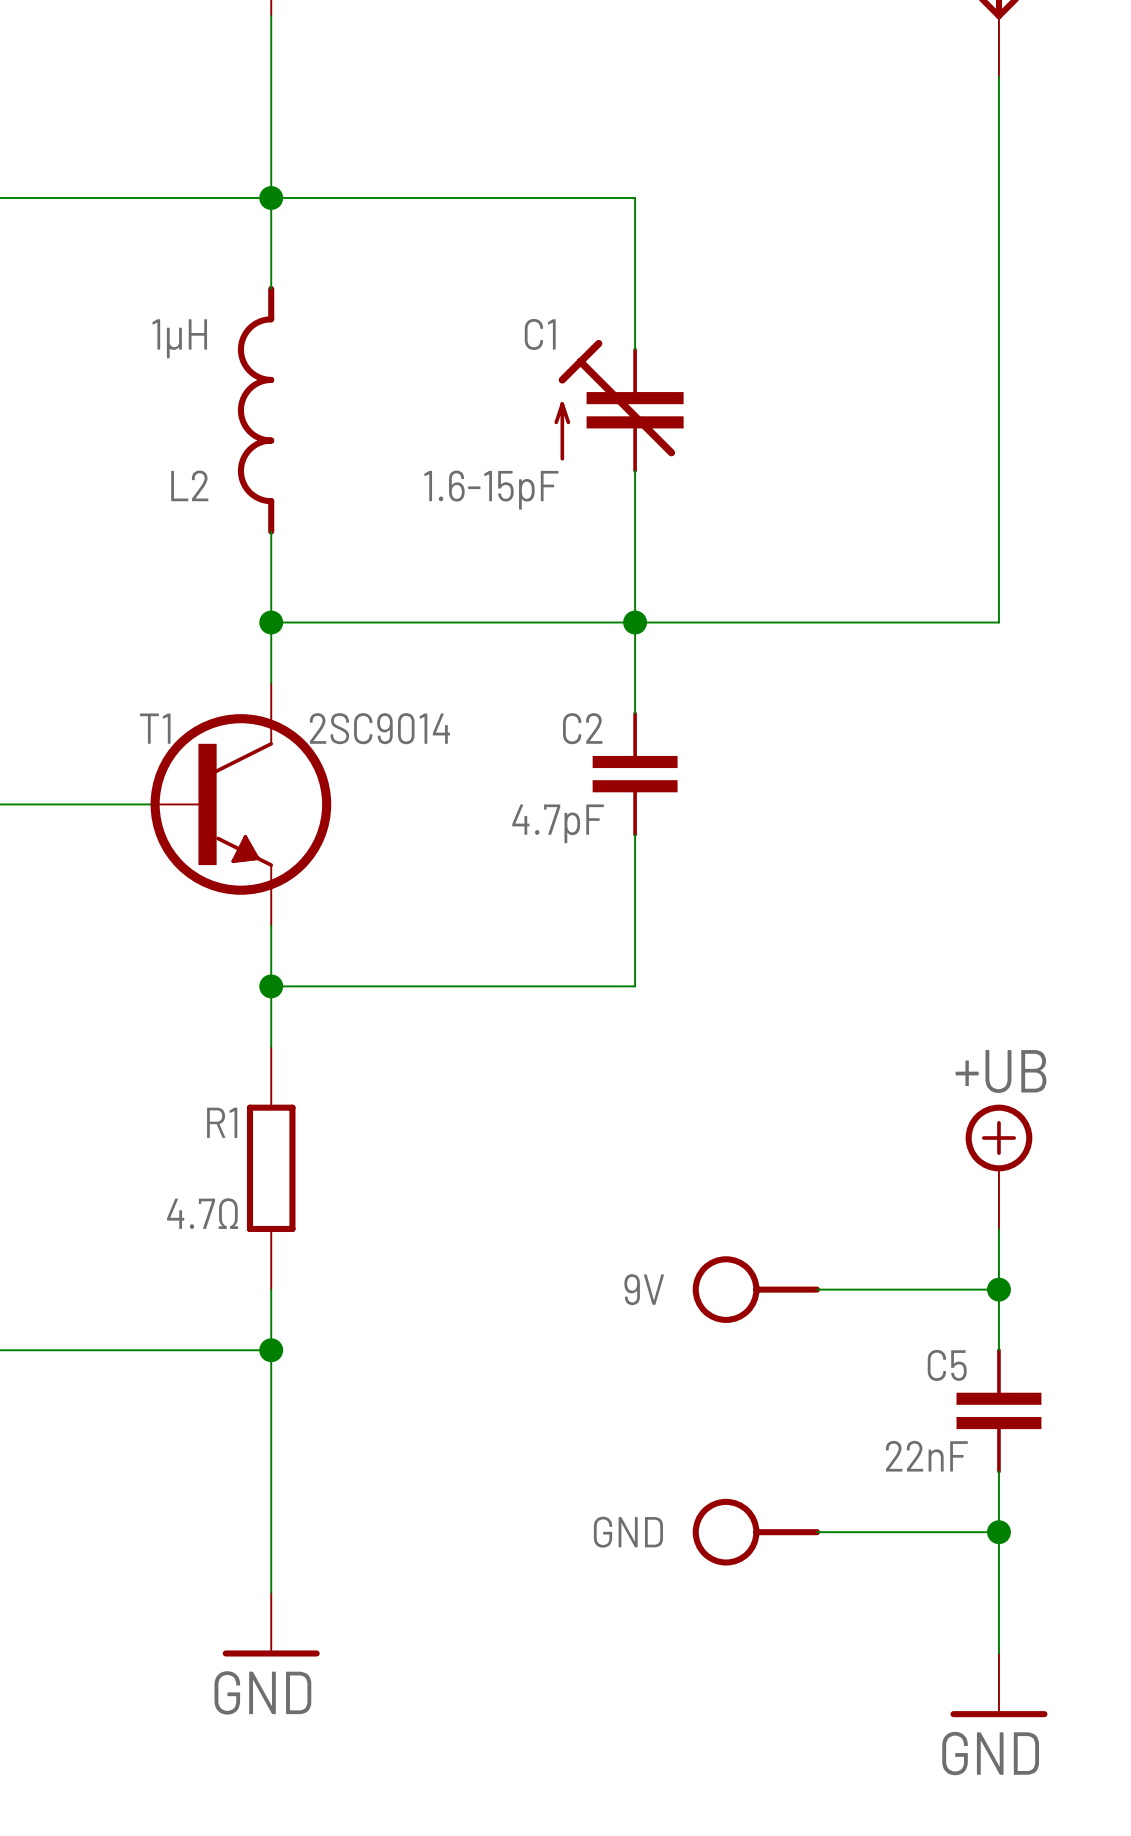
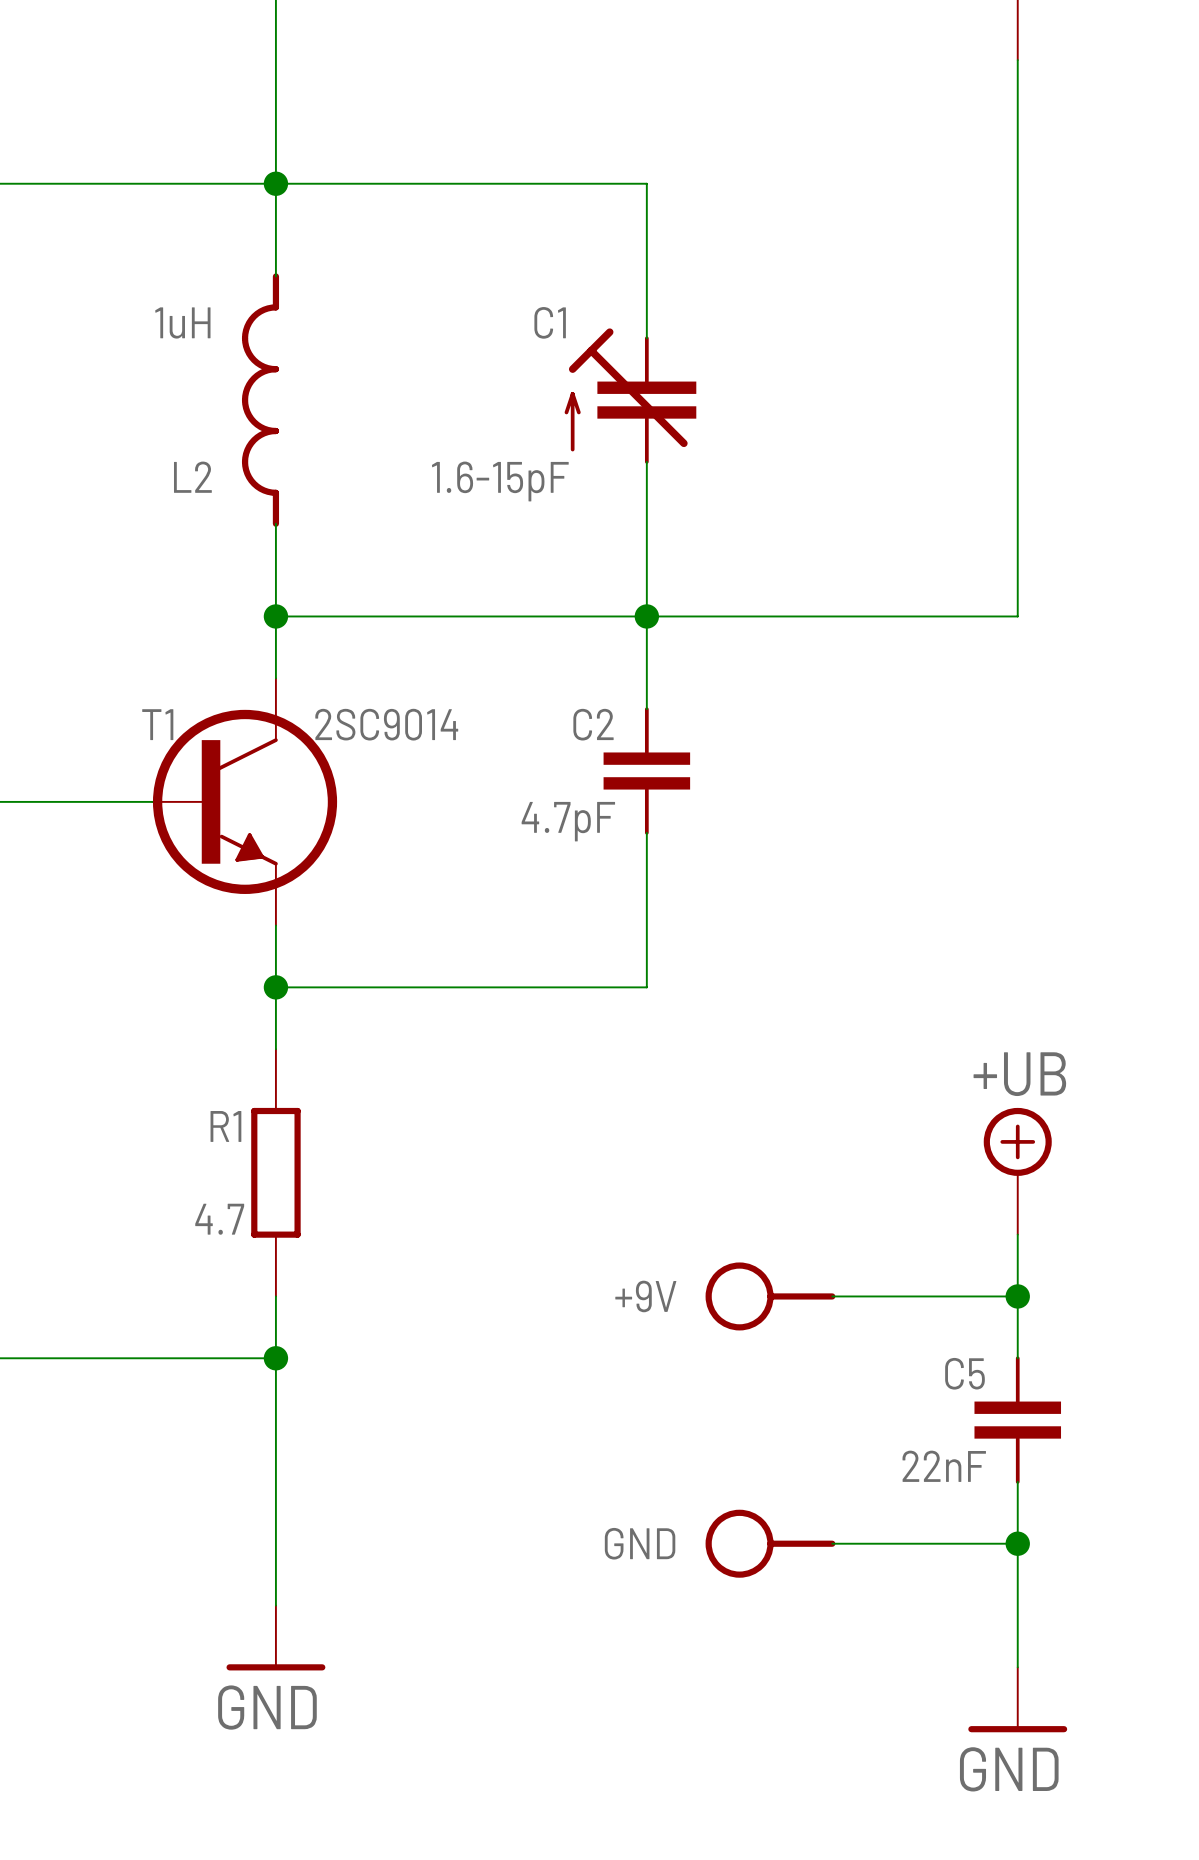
L2 value: 1μH (179, 338) -> 1uH (182, 322)
R1 value: 4.7Ω (202, 1213) -> 4.7 (219, 1219)
9V name: 9V (644, 1289) -> +9V (645, 1296)

